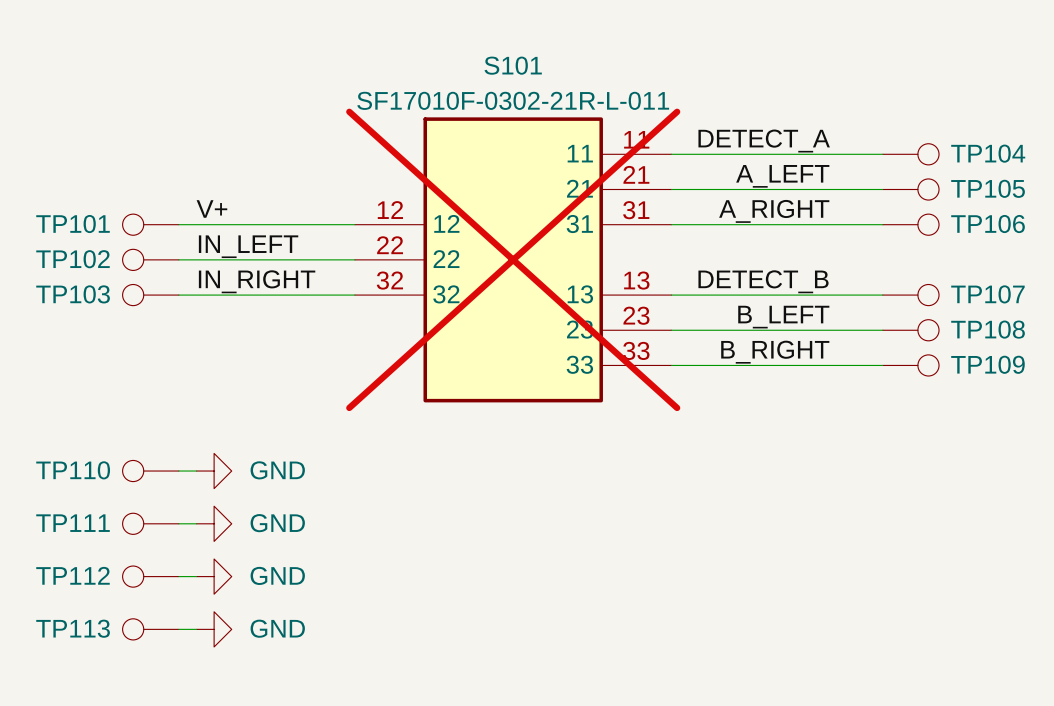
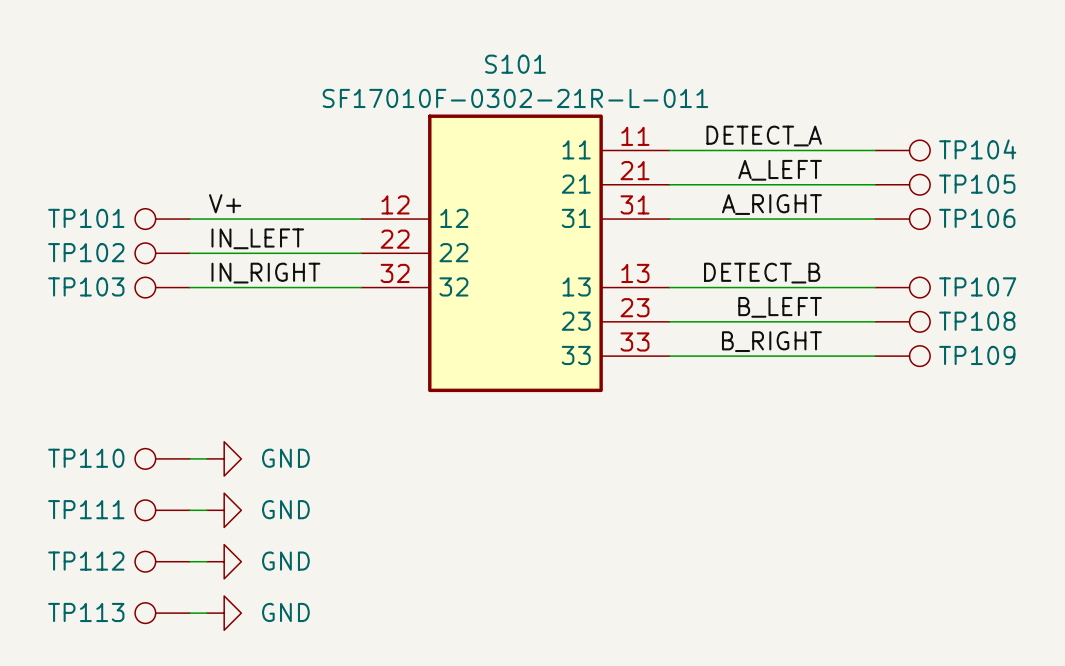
S101 do-not-place cross: (513, 259) -> none

